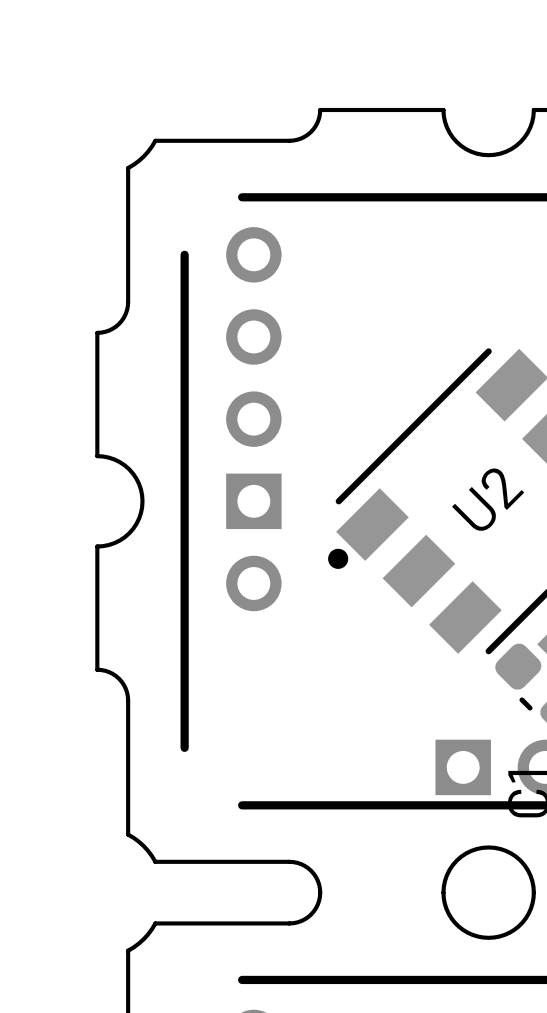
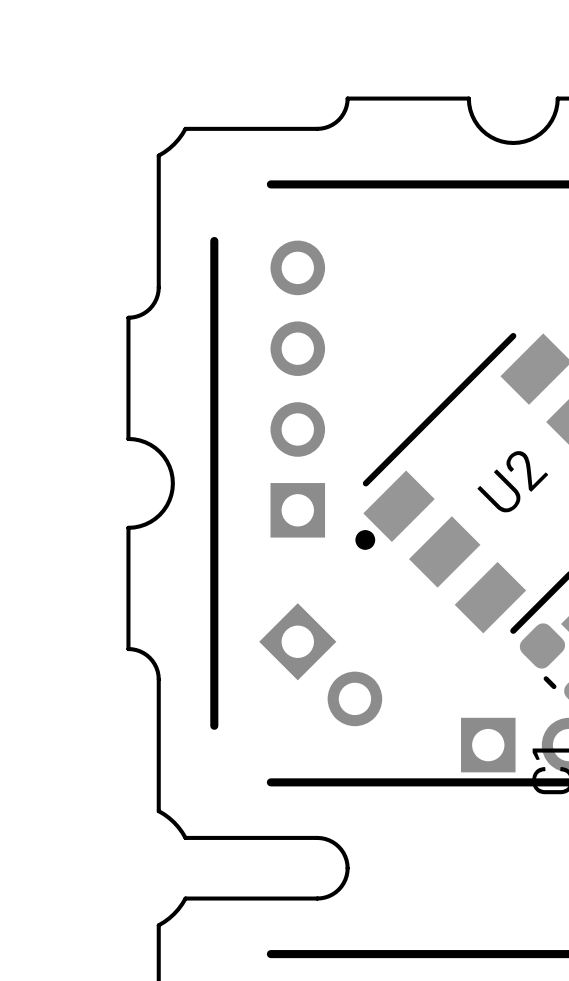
part footprint: [226, 227, 282, 612] -> [270, 240, 326, 538]
part: none -> (320, 664)
board edge: (443, 892) (448, 913) (458, 926) (472, 934) (488, 937) (504, 934) (518, 926) (528, 913) (533, 892) (530, 875) (520, 860) (505, 850) (488, 847) (471, 850) (456, 860) (446, 875) (443, 892) -> none

